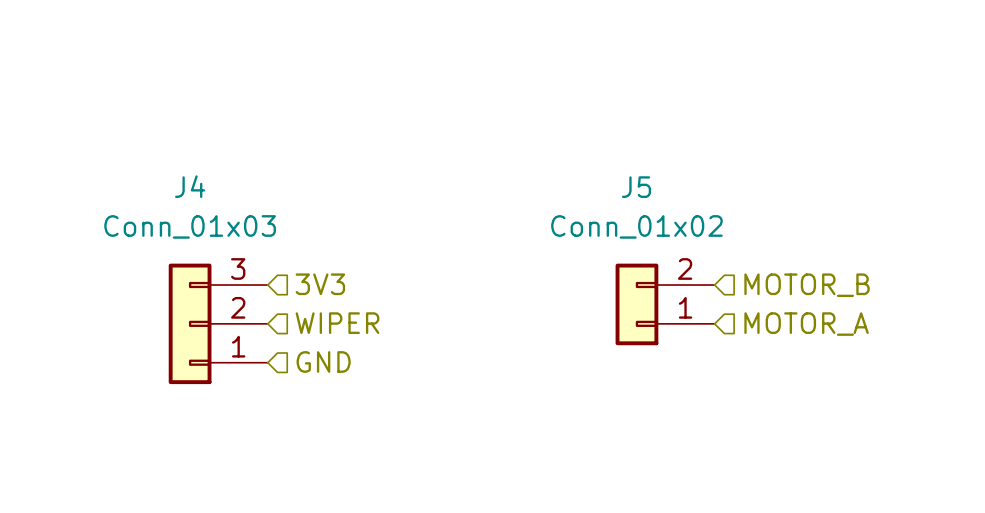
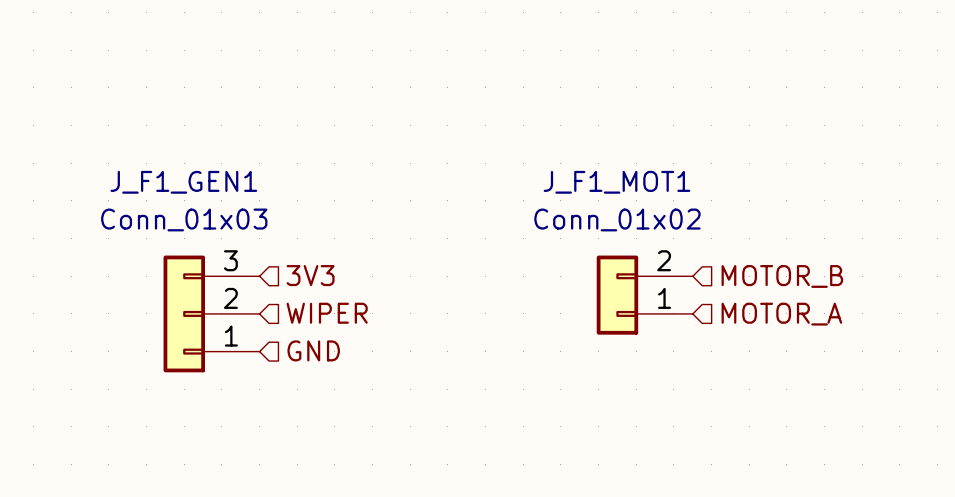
J4 name: J4 (190, 186) -> J_F1_GEN1 (183, 182)
J5 name: J5 (636, 187) -> J_F1_MOT1 (617, 182)

